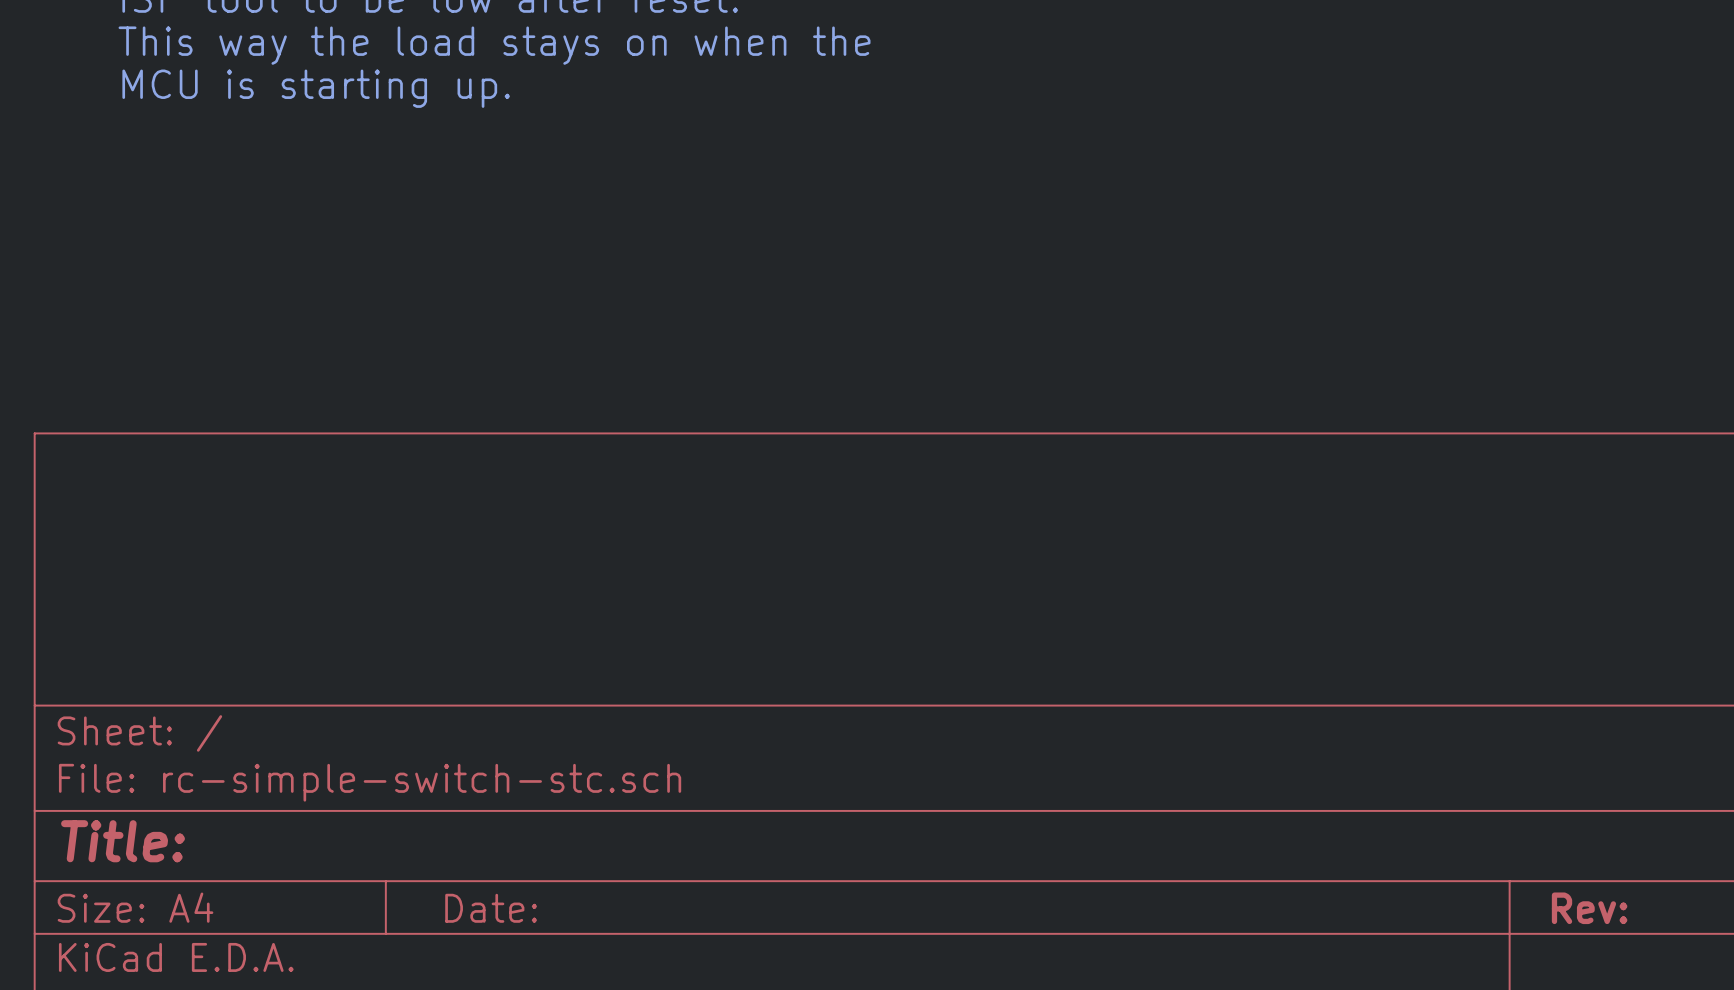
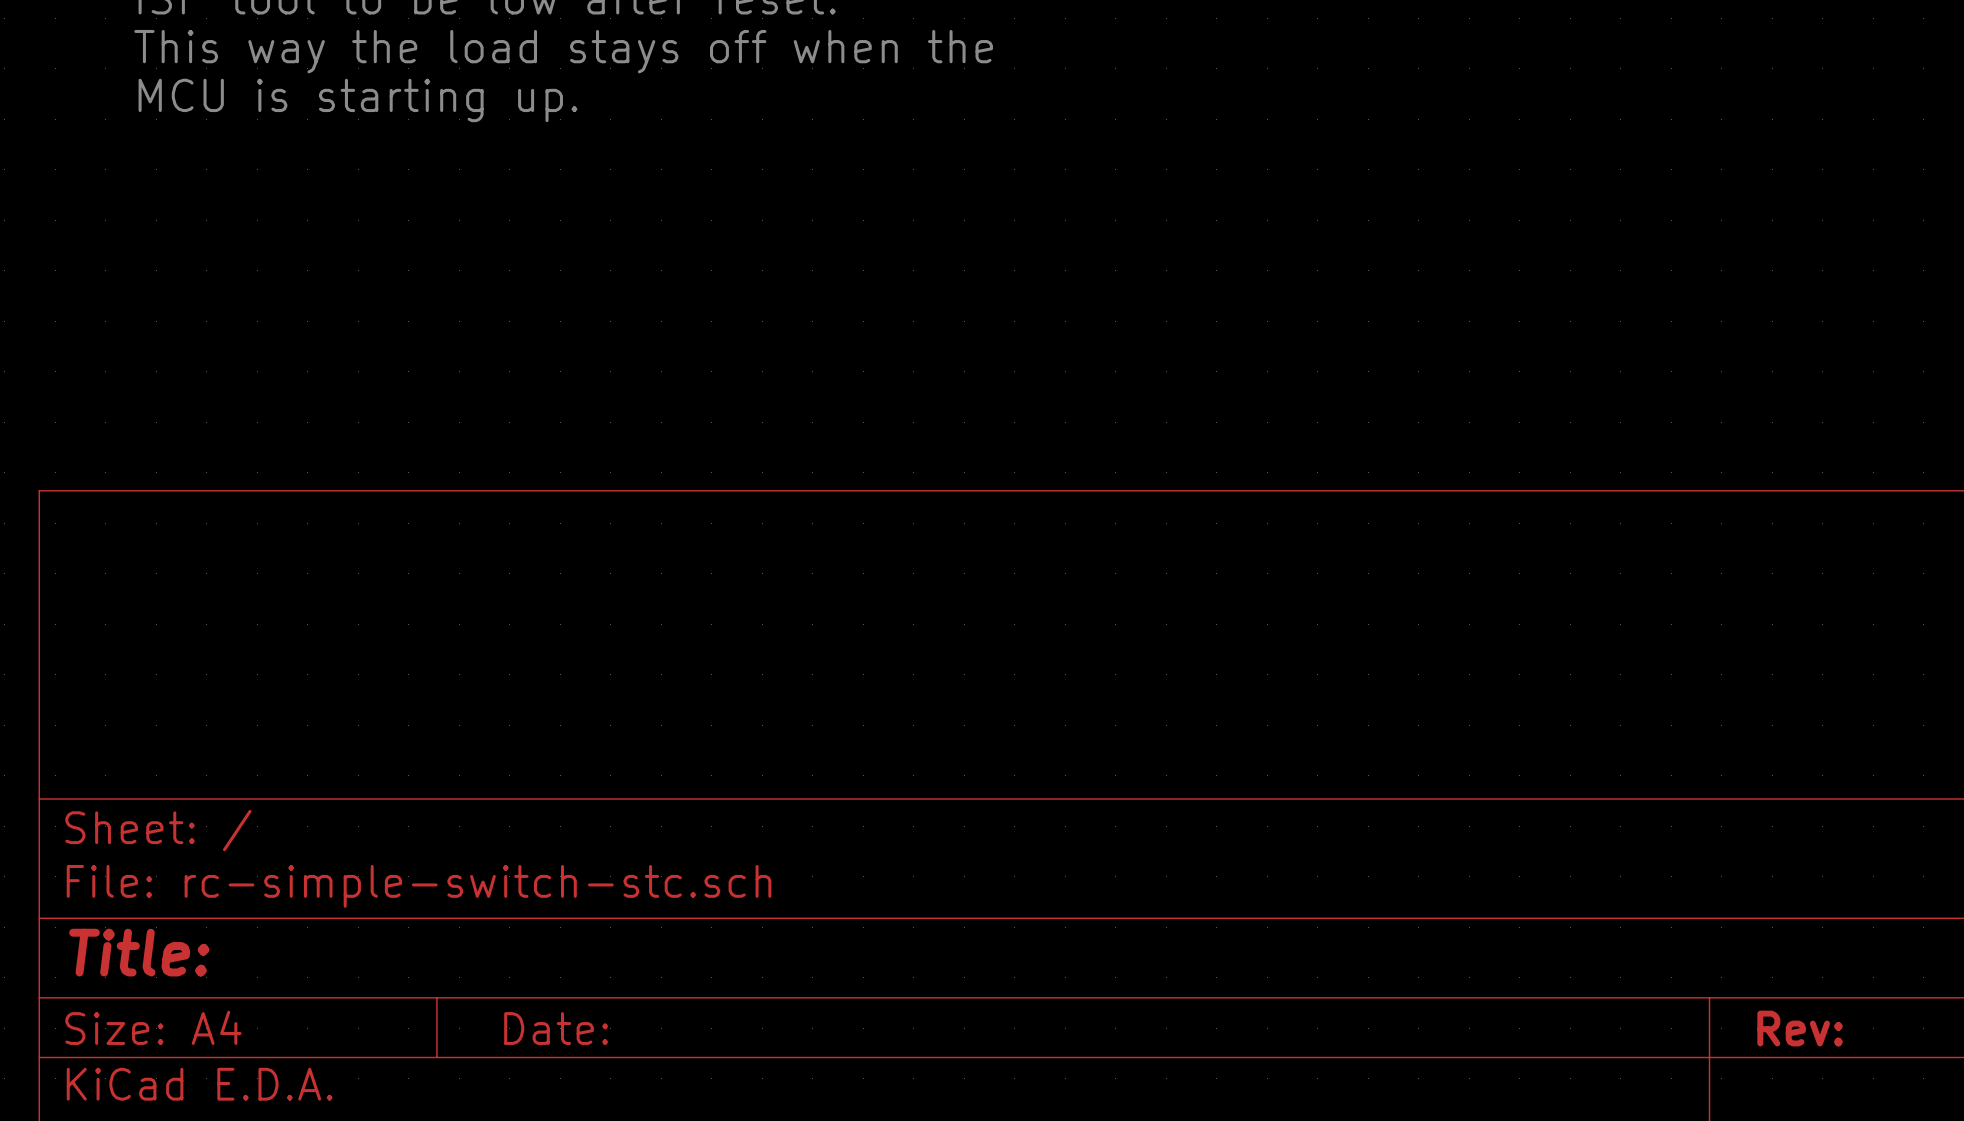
text: This way the load stays on when the (494, 45) -> This way the load stays off when the (563, 51)

